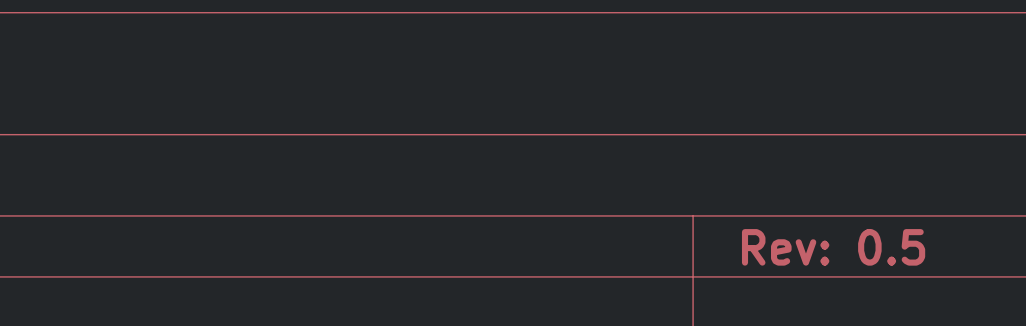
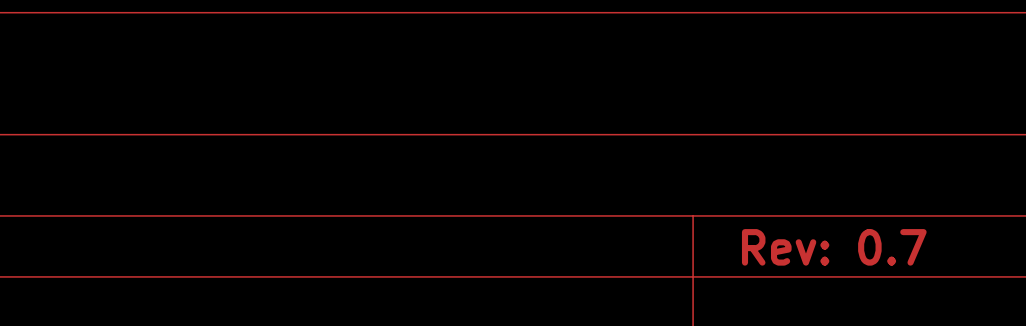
title block: Rev: 0.5 (833, 247) -> Rev: 0.7 (834, 247)

